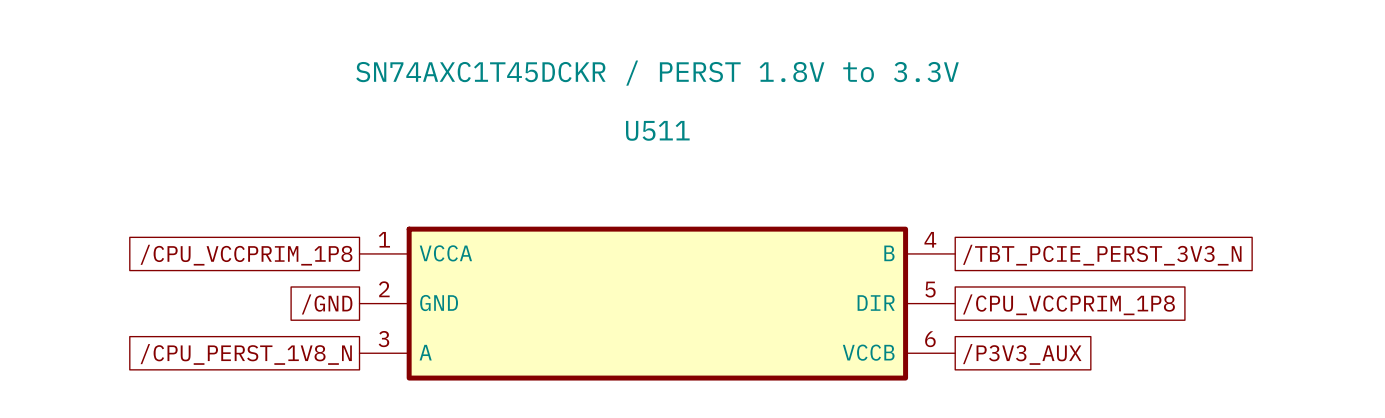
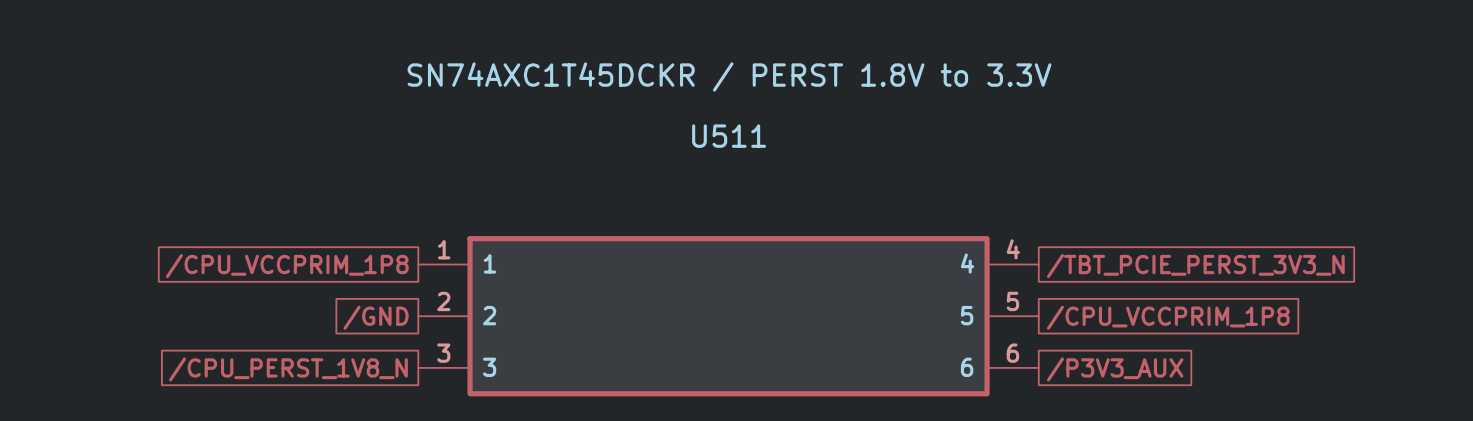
U511 pin name: VCCA (445, 253) -> 1 (490, 263)
U511 pin name: B (889, 253) -> 4 (967, 263)
U511 pin name: GND (439, 303) -> 2 (489, 315)
U511 pin name: DIR (876, 303) -> 5 (967, 315)
U511 pin name: A (425, 352) -> 3 (489, 367)
U511 pin name: VCCB (868, 352) -> 6 (967, 367)

